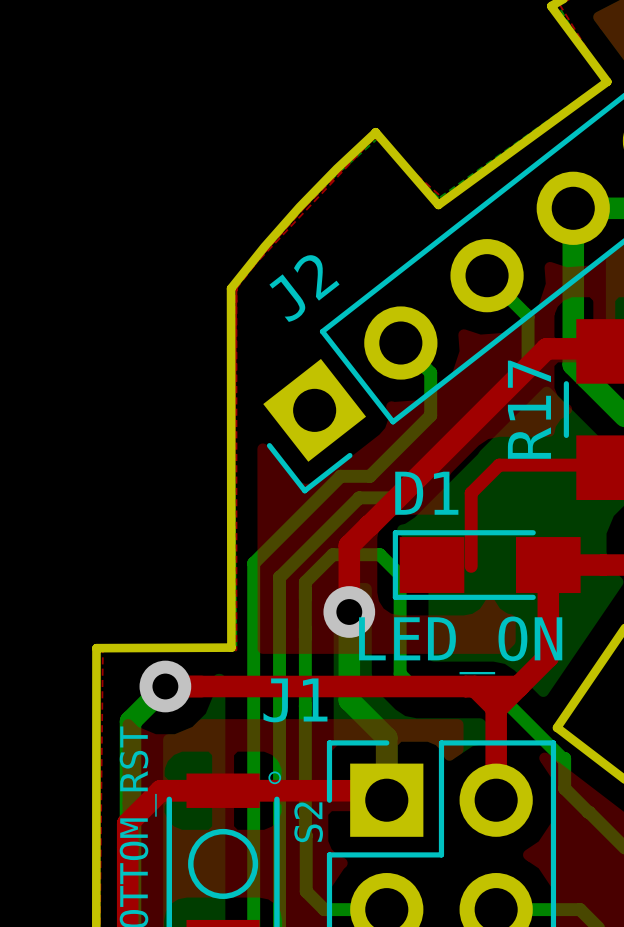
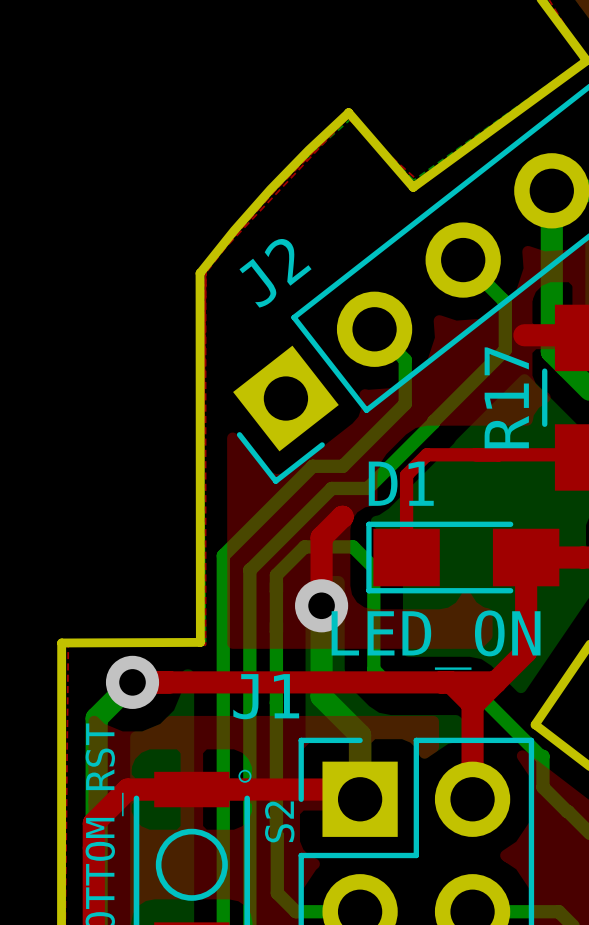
top track: (546, 348) (369, 525) -> none
top track: (499, 465) (471, 493) (471, 566) -> (475, 454) (426, 454) (406, 475) (406, 557)

